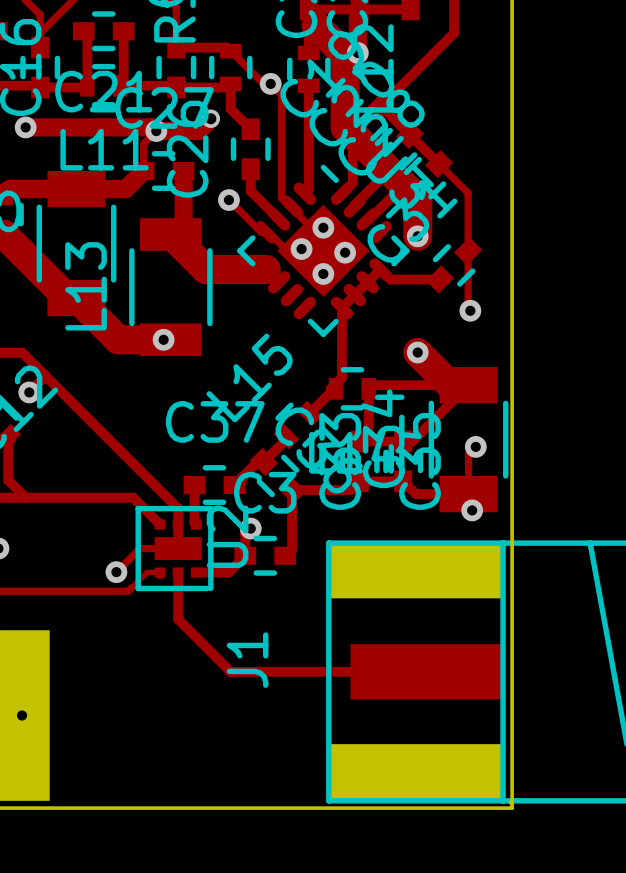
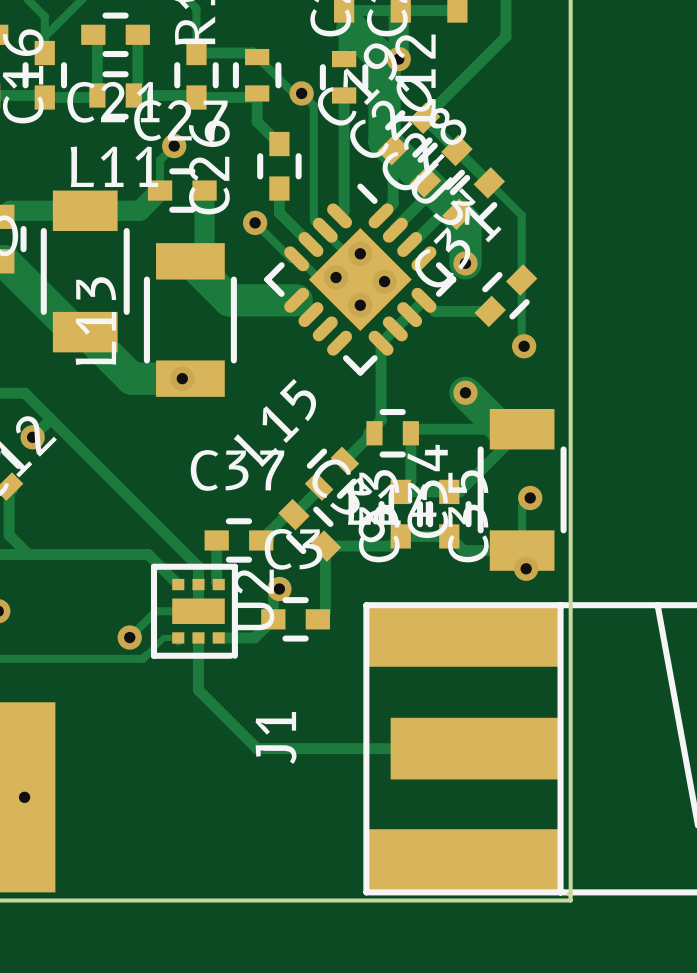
track: (210, 118) (198, 131) (156, 131) (152, 127) (25, 127) -> none
via: (210, 118) -> none
via: (25, 127) -> none

